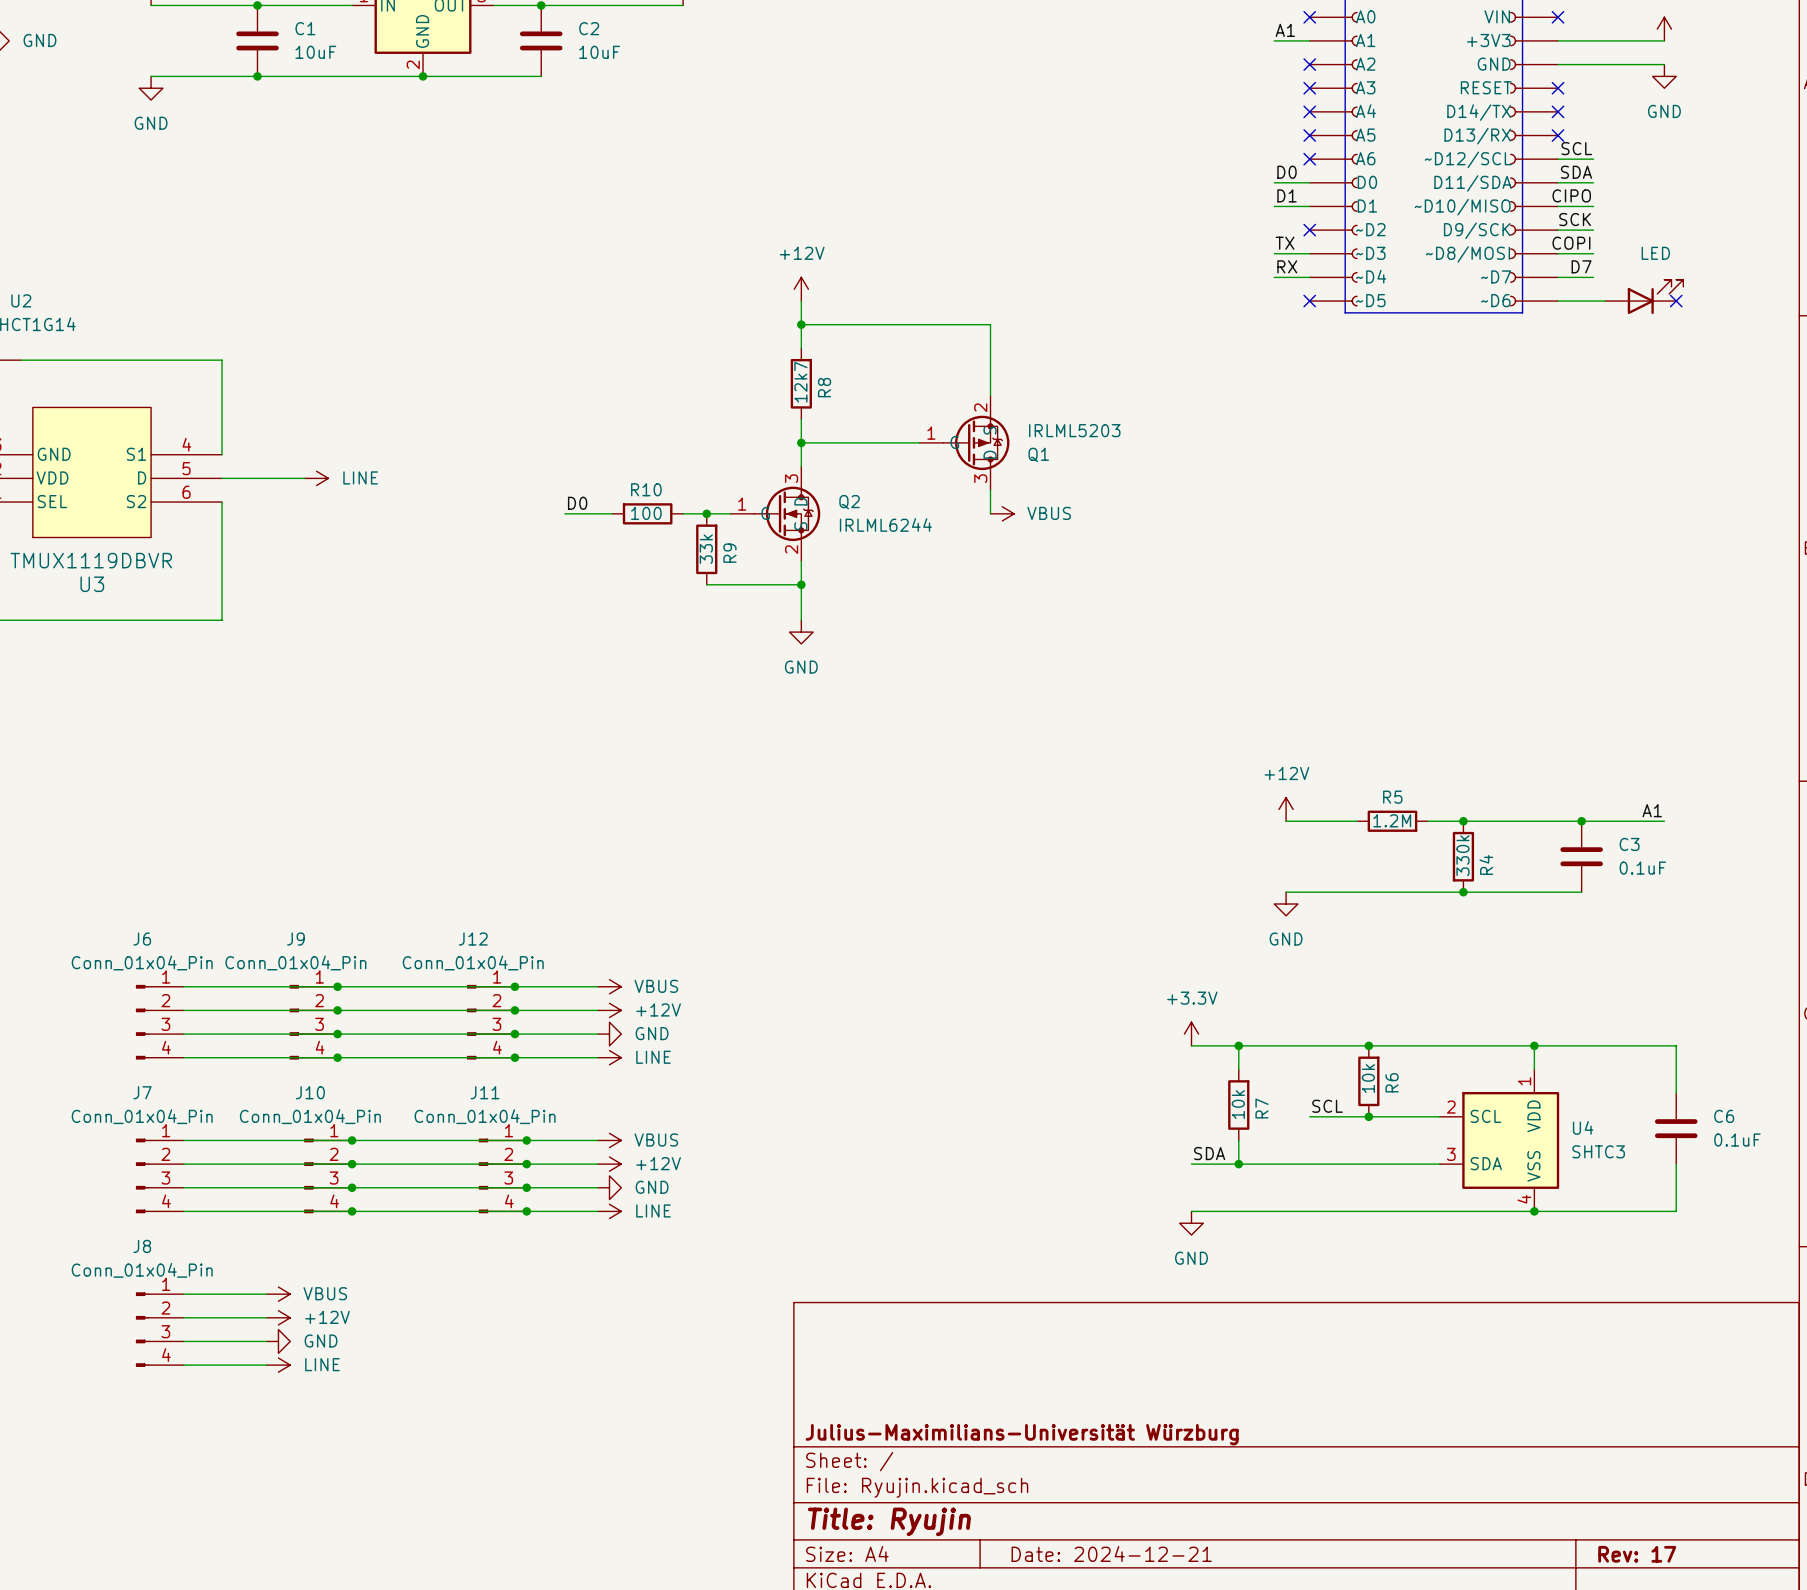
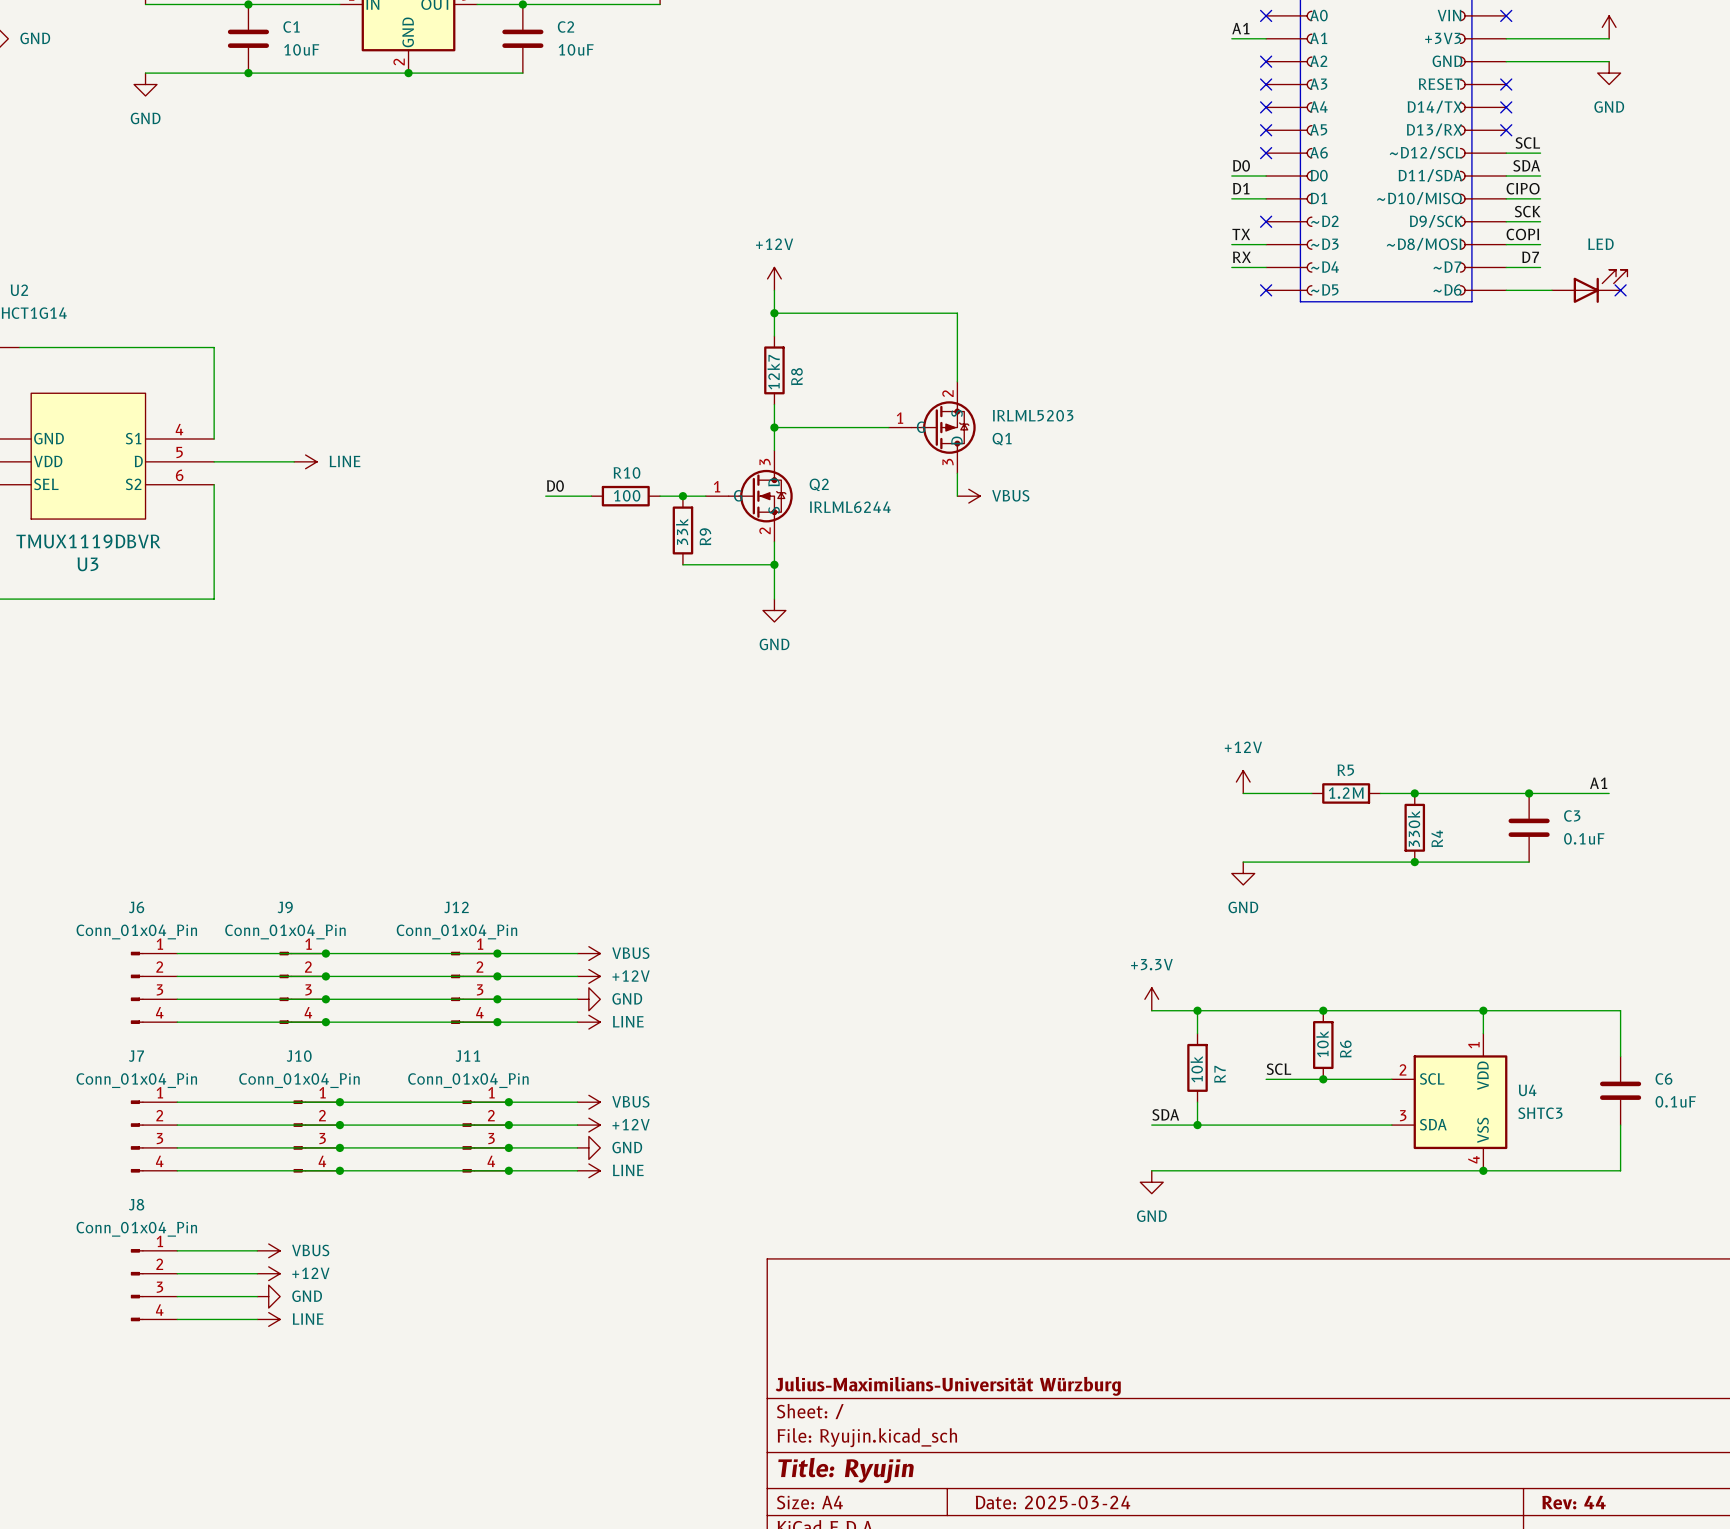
title block: Date: 2024-12-21 (1111, 1553) -> Date: 2025-03-24 (1053, 1502)
title block: Rev: 17 (1637, 1554) -> Rev: 44 (1574, 1502)

